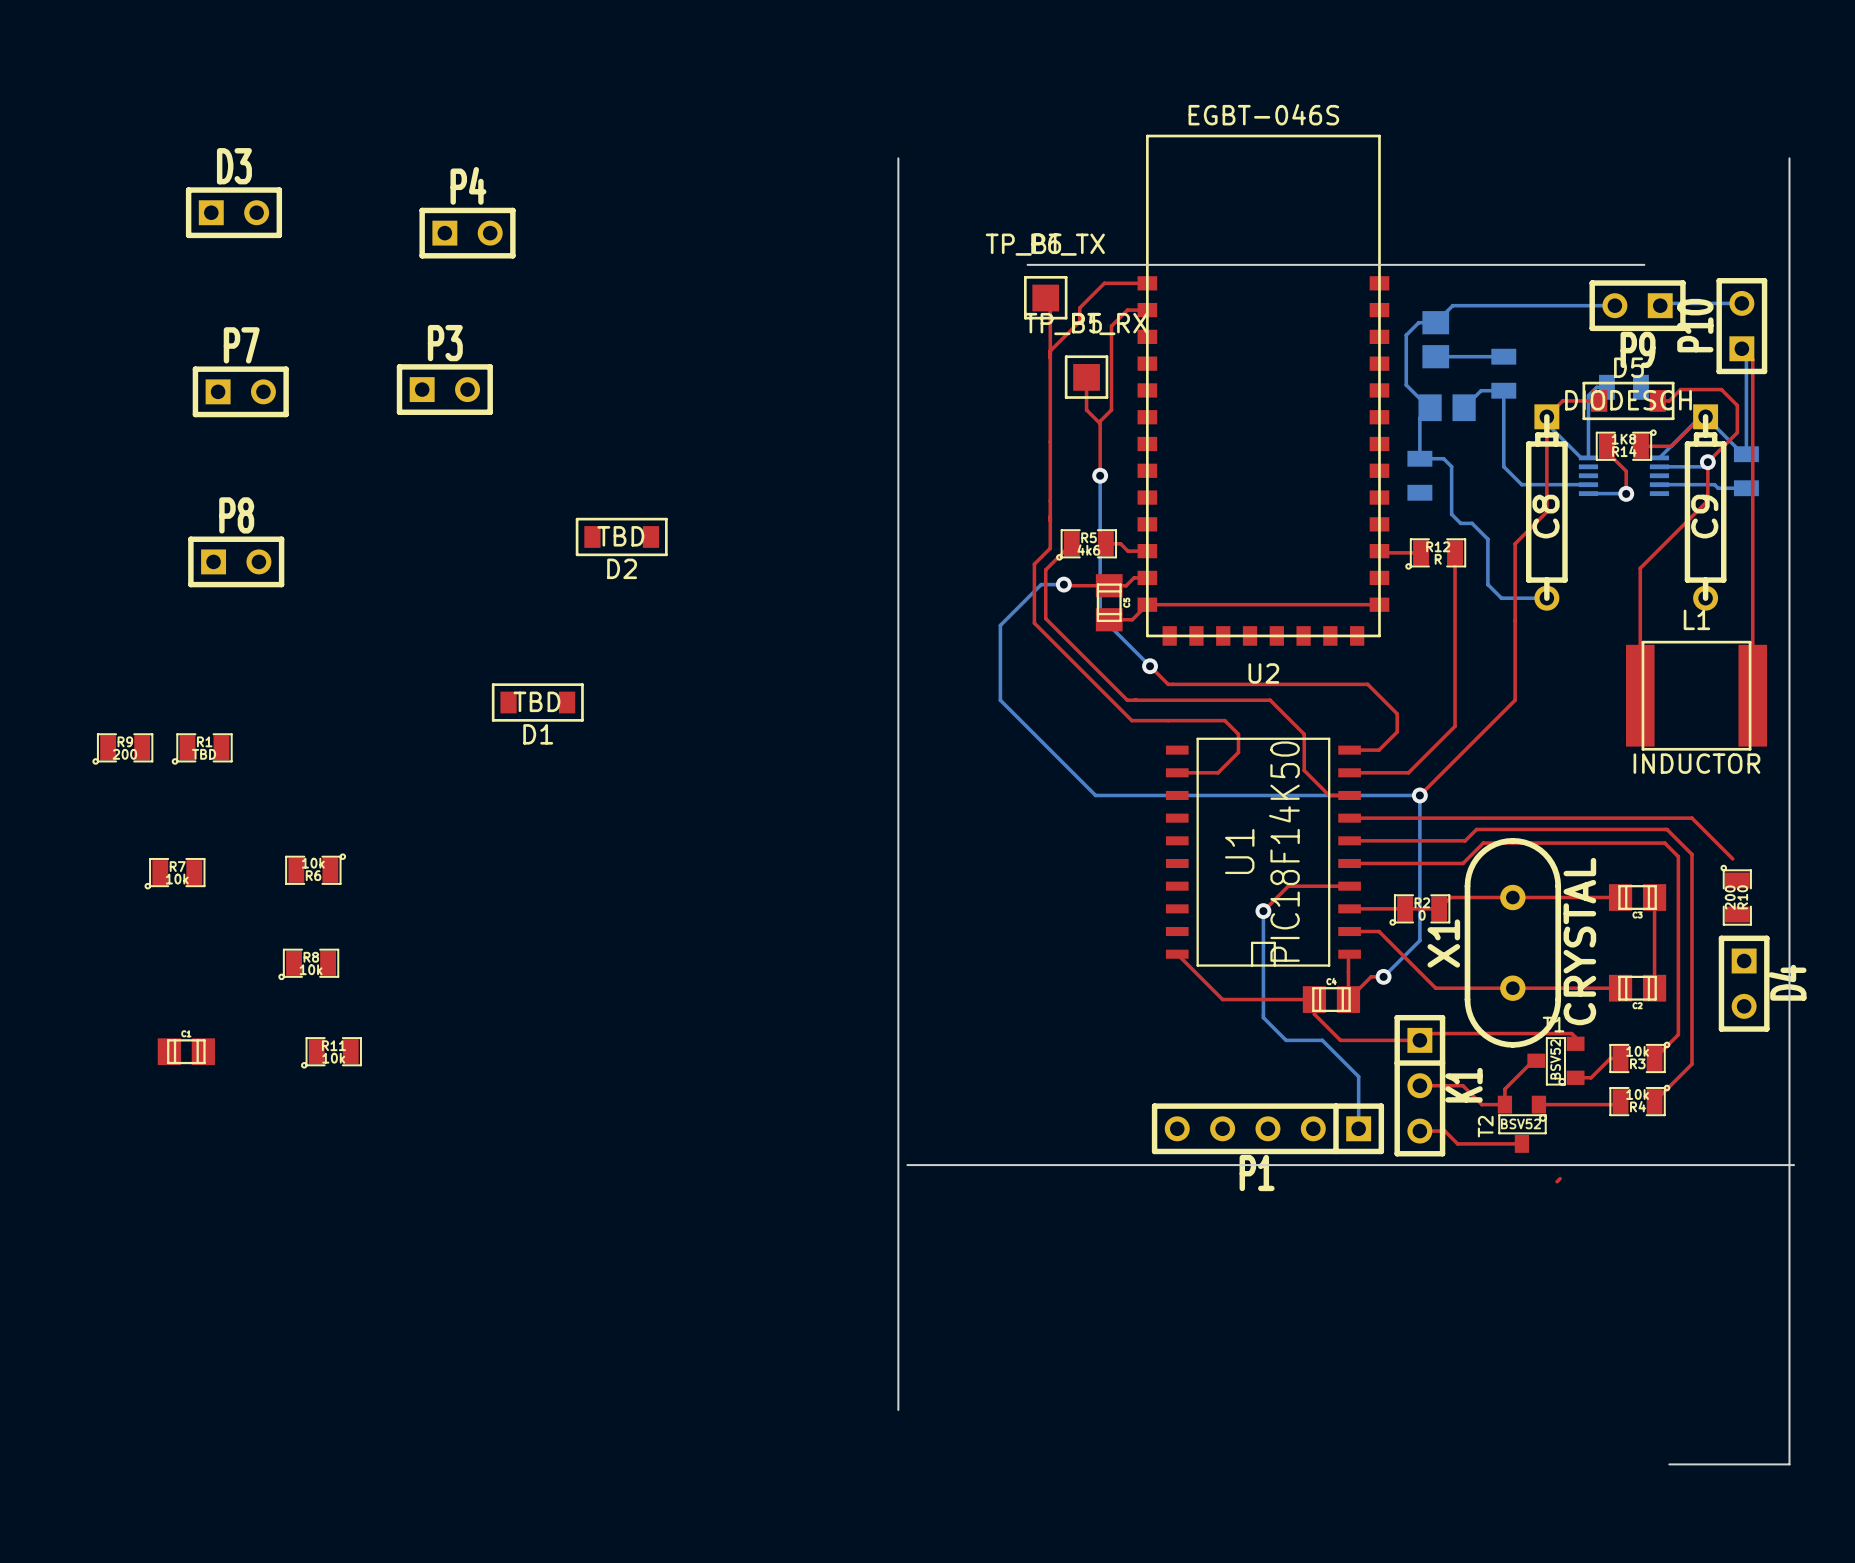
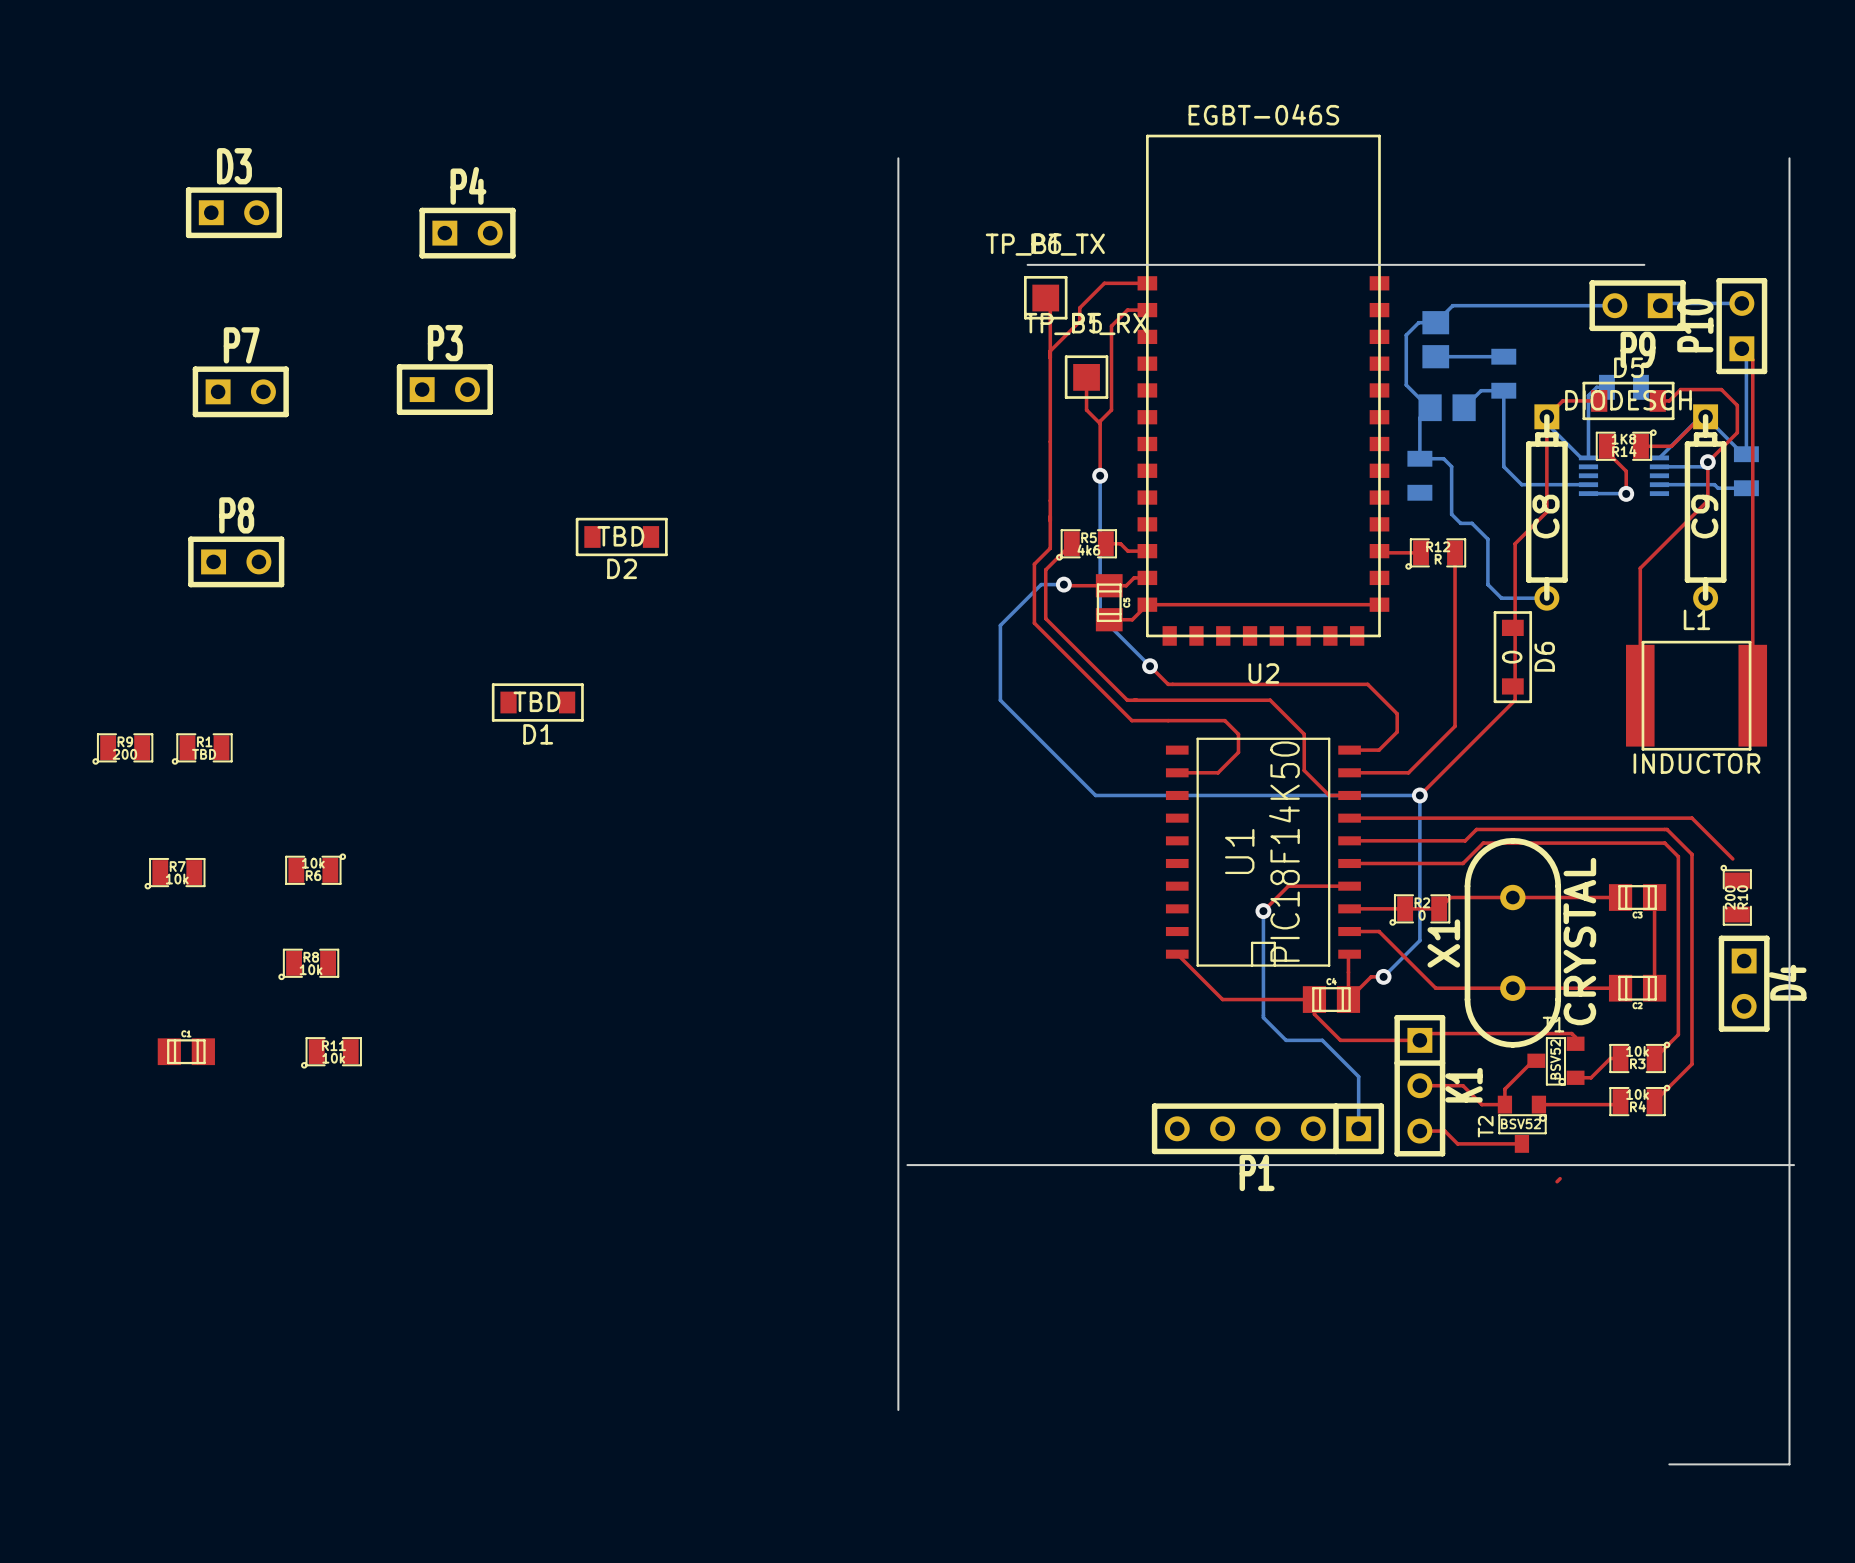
D6: none -> 0 (1512, 657)

